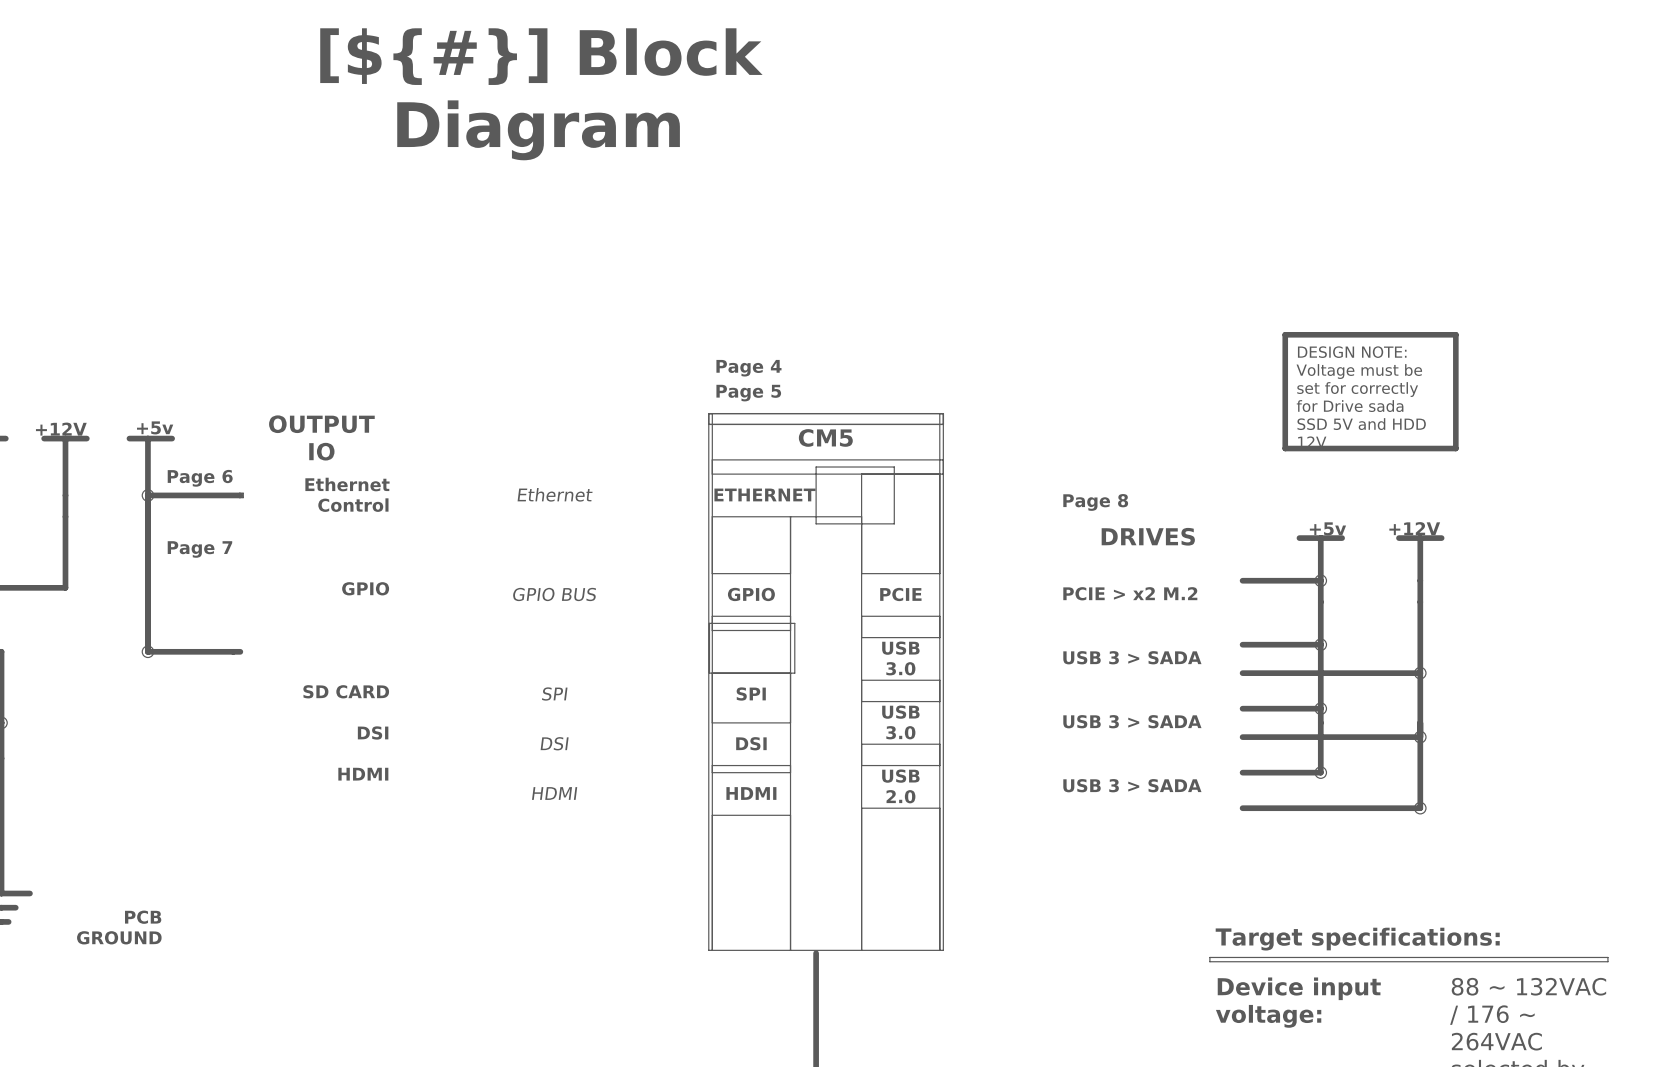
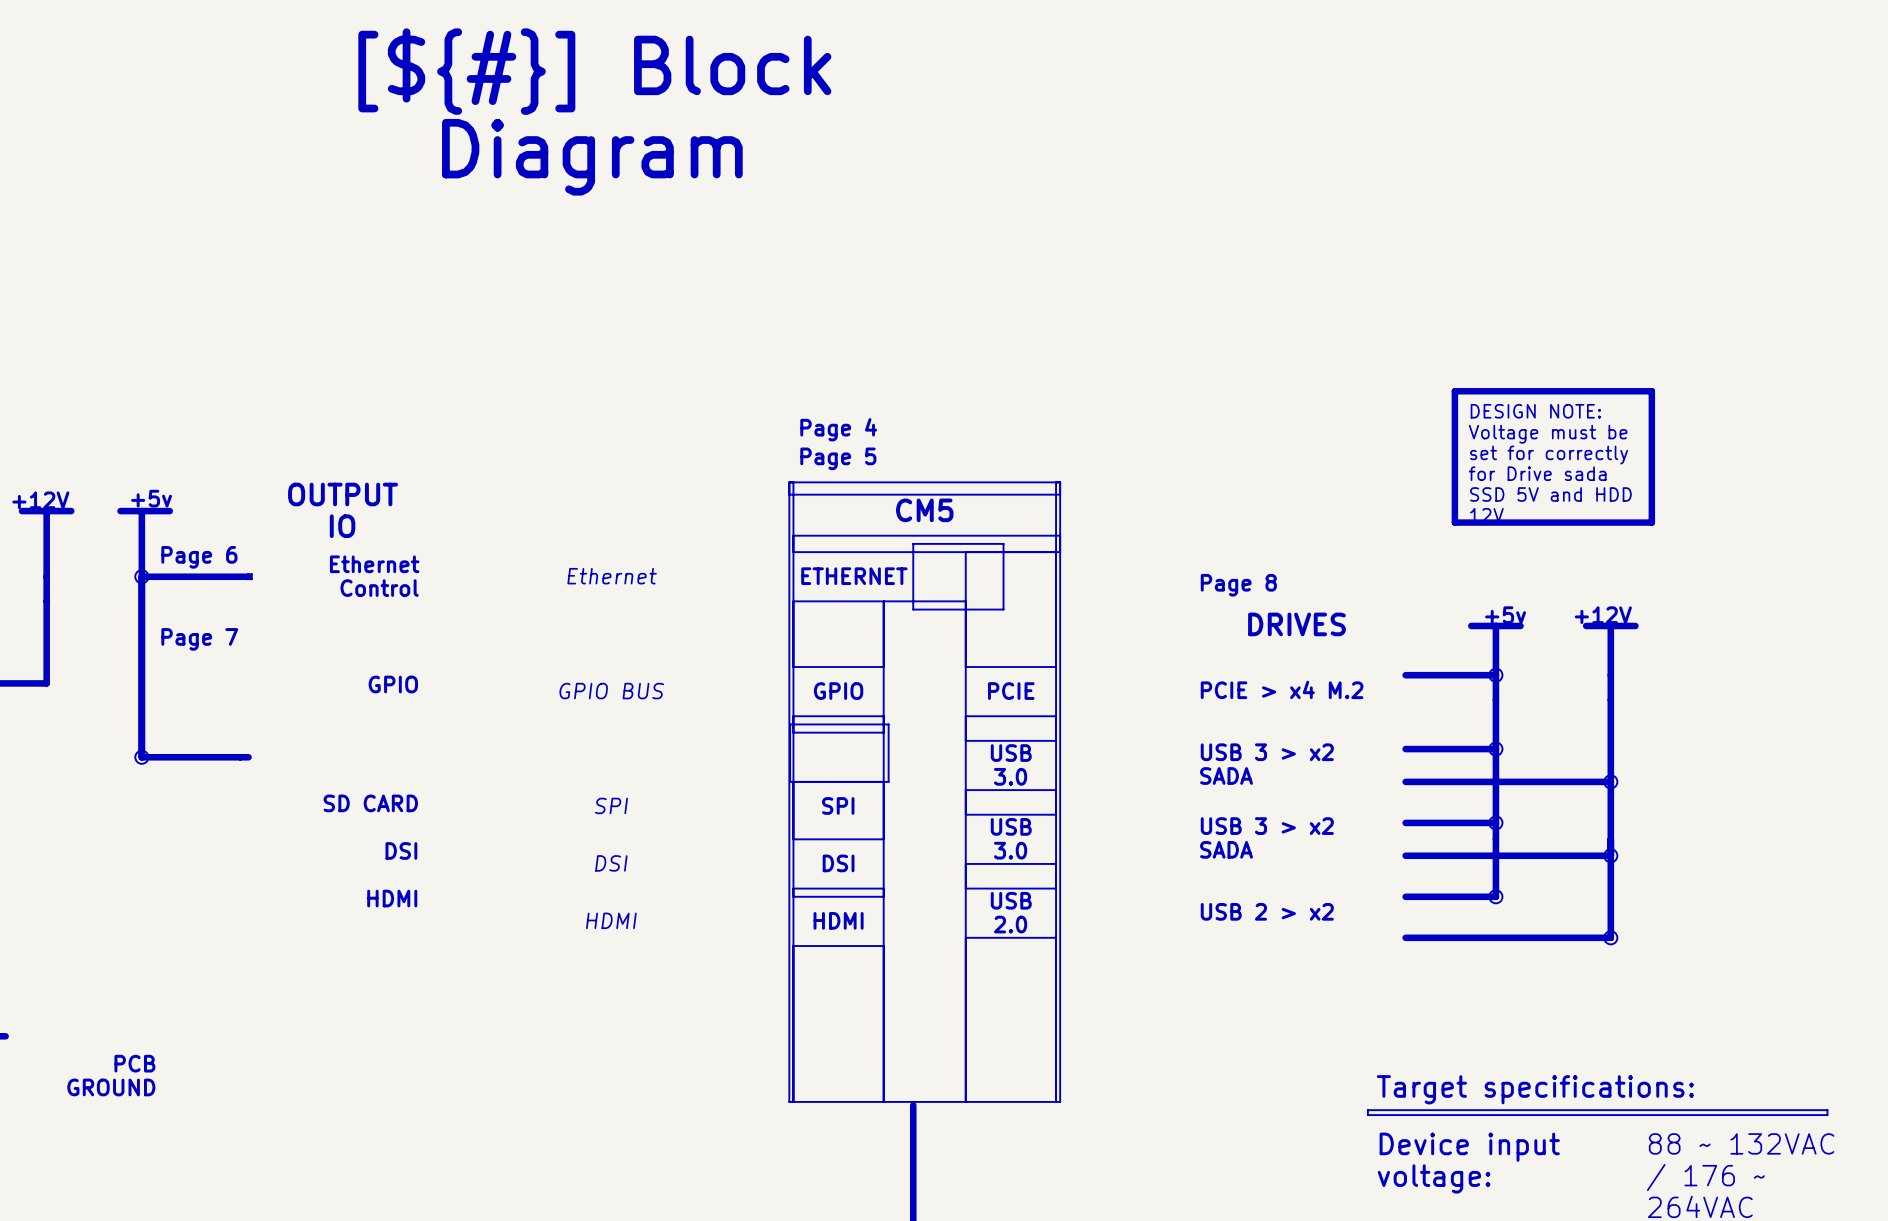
text: PCIE > x2 M.2 (1130, 593) -> PCIE > x4 M.2 (1282, 689)
text: USB 3 > SADA (1132, 657) -> USB 3 > x2 (1267, 752)
text: none -> SADA (1226, 776)
text: USB 3 > SADA (1132, 721) -> USB 3 > x2 (1267, 826)
text: none -> SADA (1226, 849)
text: USB 3 > SADA (1132, 785) -> USB 2 > x2 (1267, 911)

